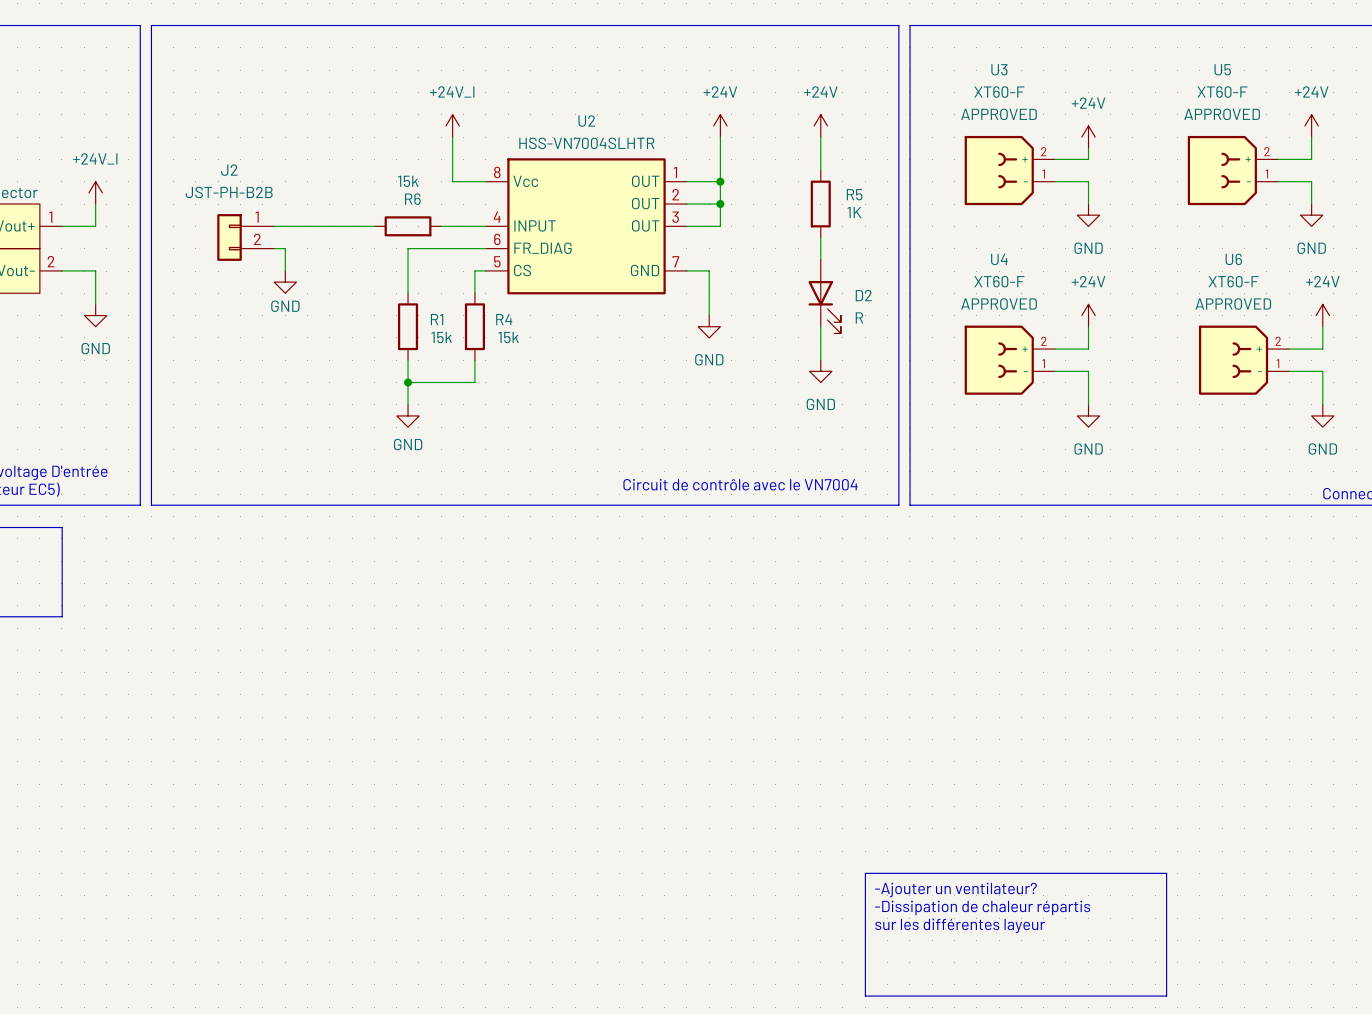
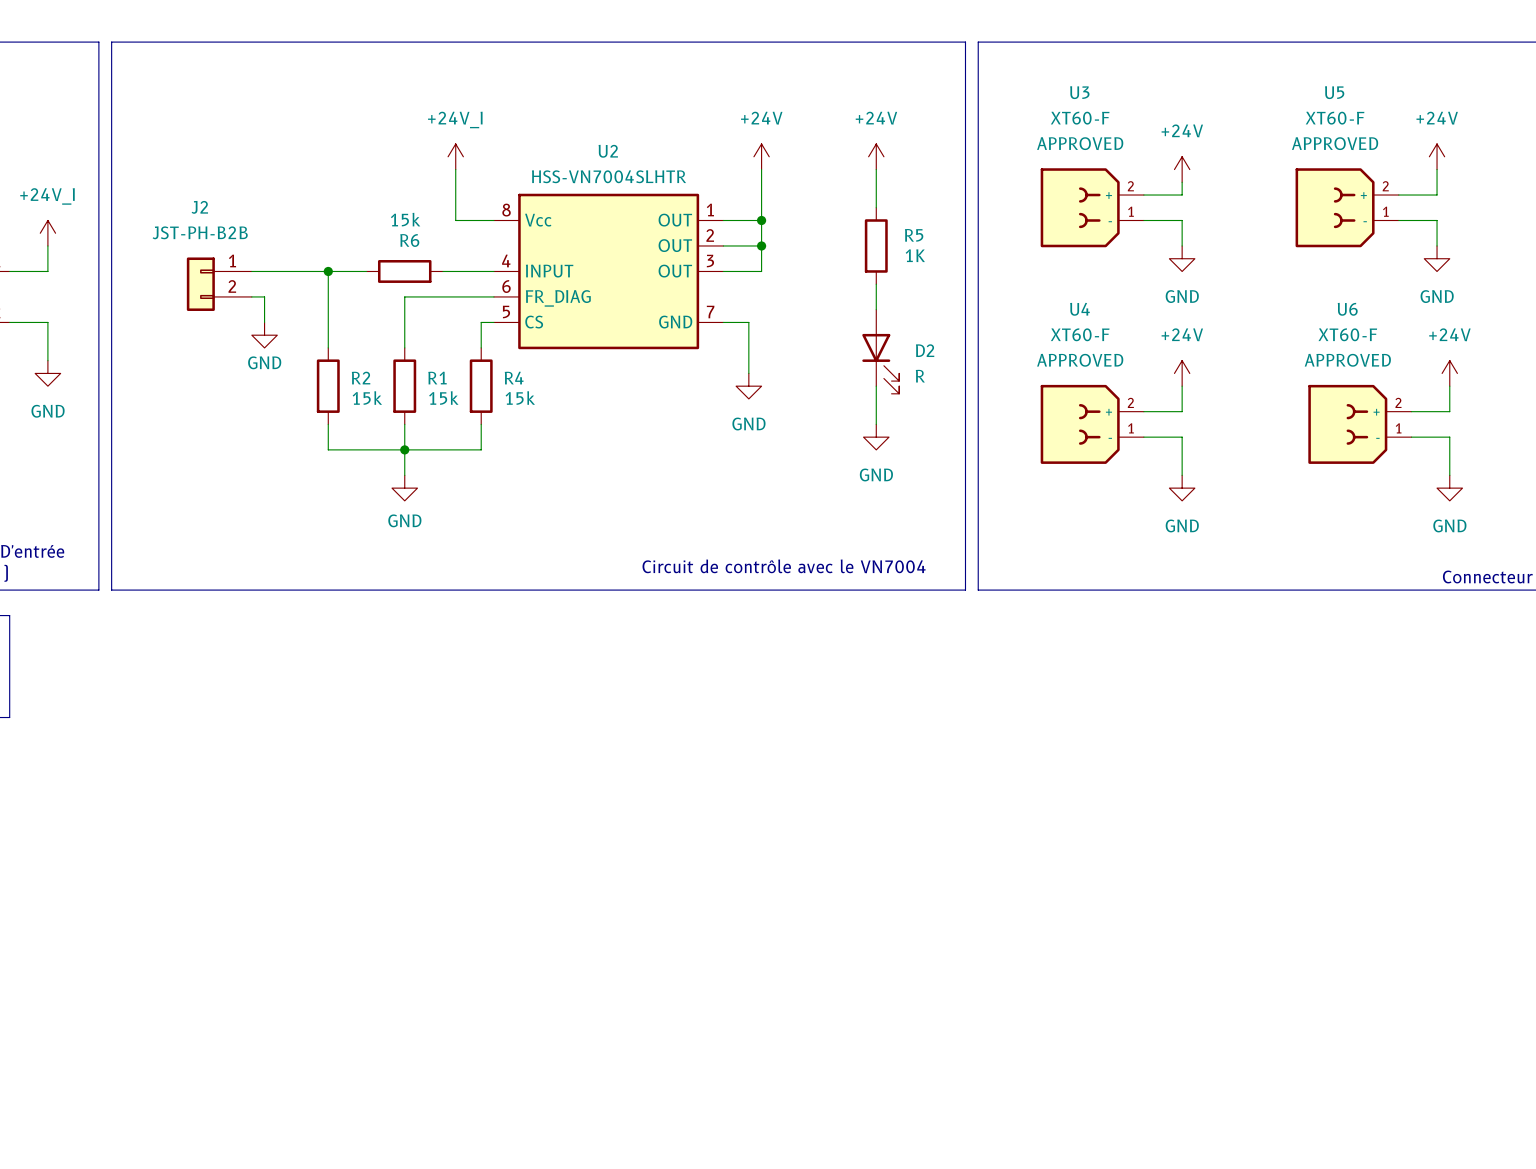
wire: none -> (328, 271) (328, 347)
junction: none -> (328, 271)
R2: none -> 15k (328, 386)
wire: none -> (328, 424) (328, 449) (404, 449)
line: (865, 873) (1166, 873) (1166, 996) (865, 996) (865, 873) -> none
text: -Ajouter un ventilateur? (955, 890) -> none
text: -Dissipation de chaleur répartis (982, 907) -> none
text: sur les différentes layeur (960, 925) -> none

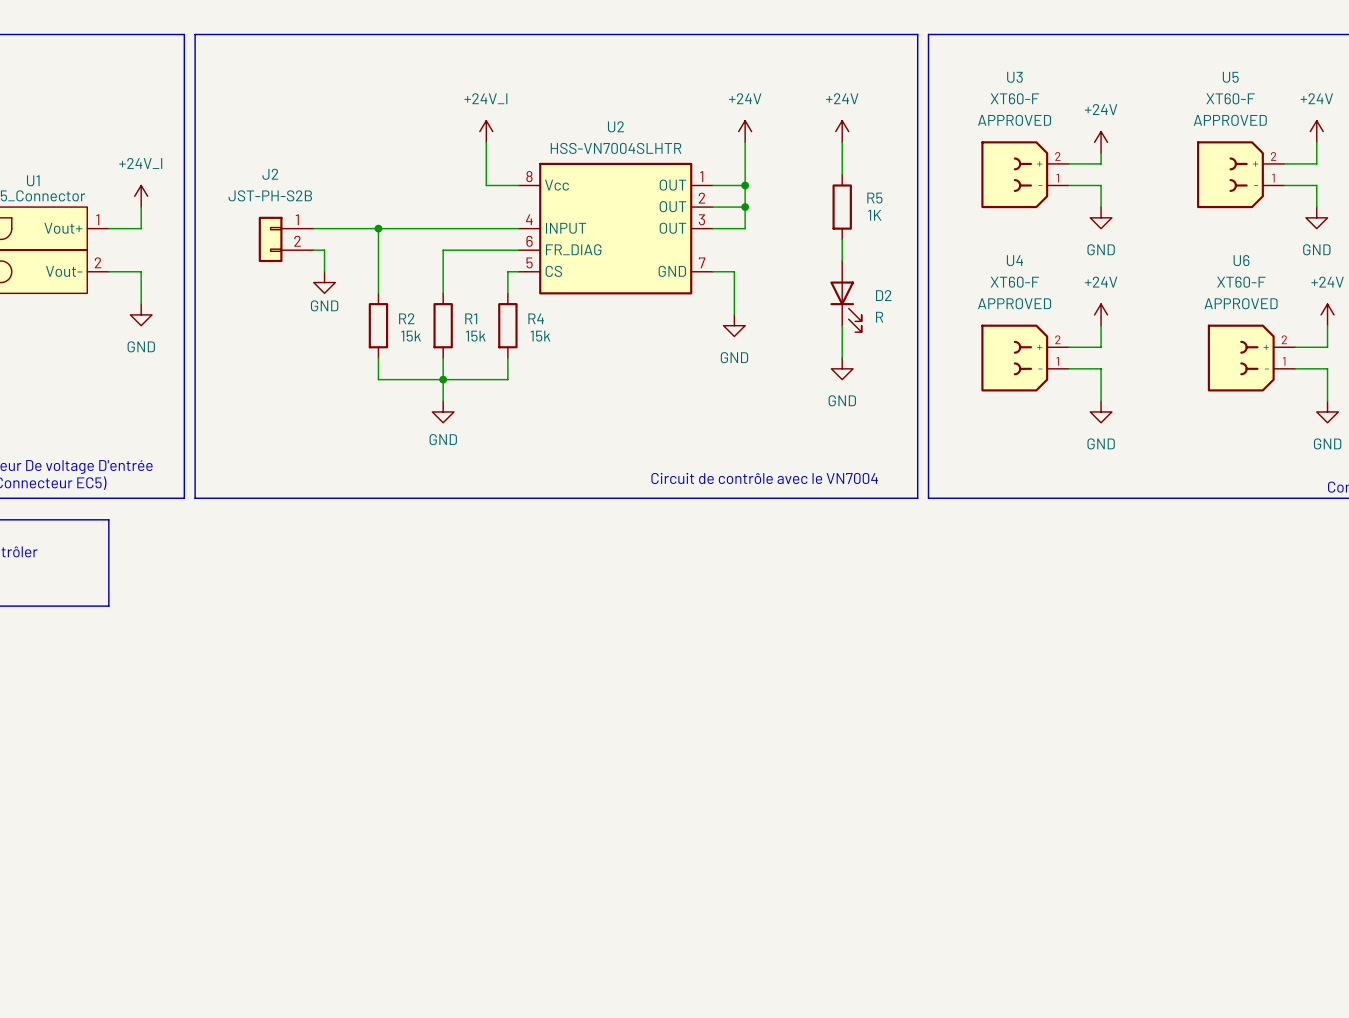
J2 value: JST-PH-B2B (200, 232) -> JST-PH-S2B (270, 195)
wire: none -> (410, 228) (475, 228)
R6: 15k (404, 271) -> none

